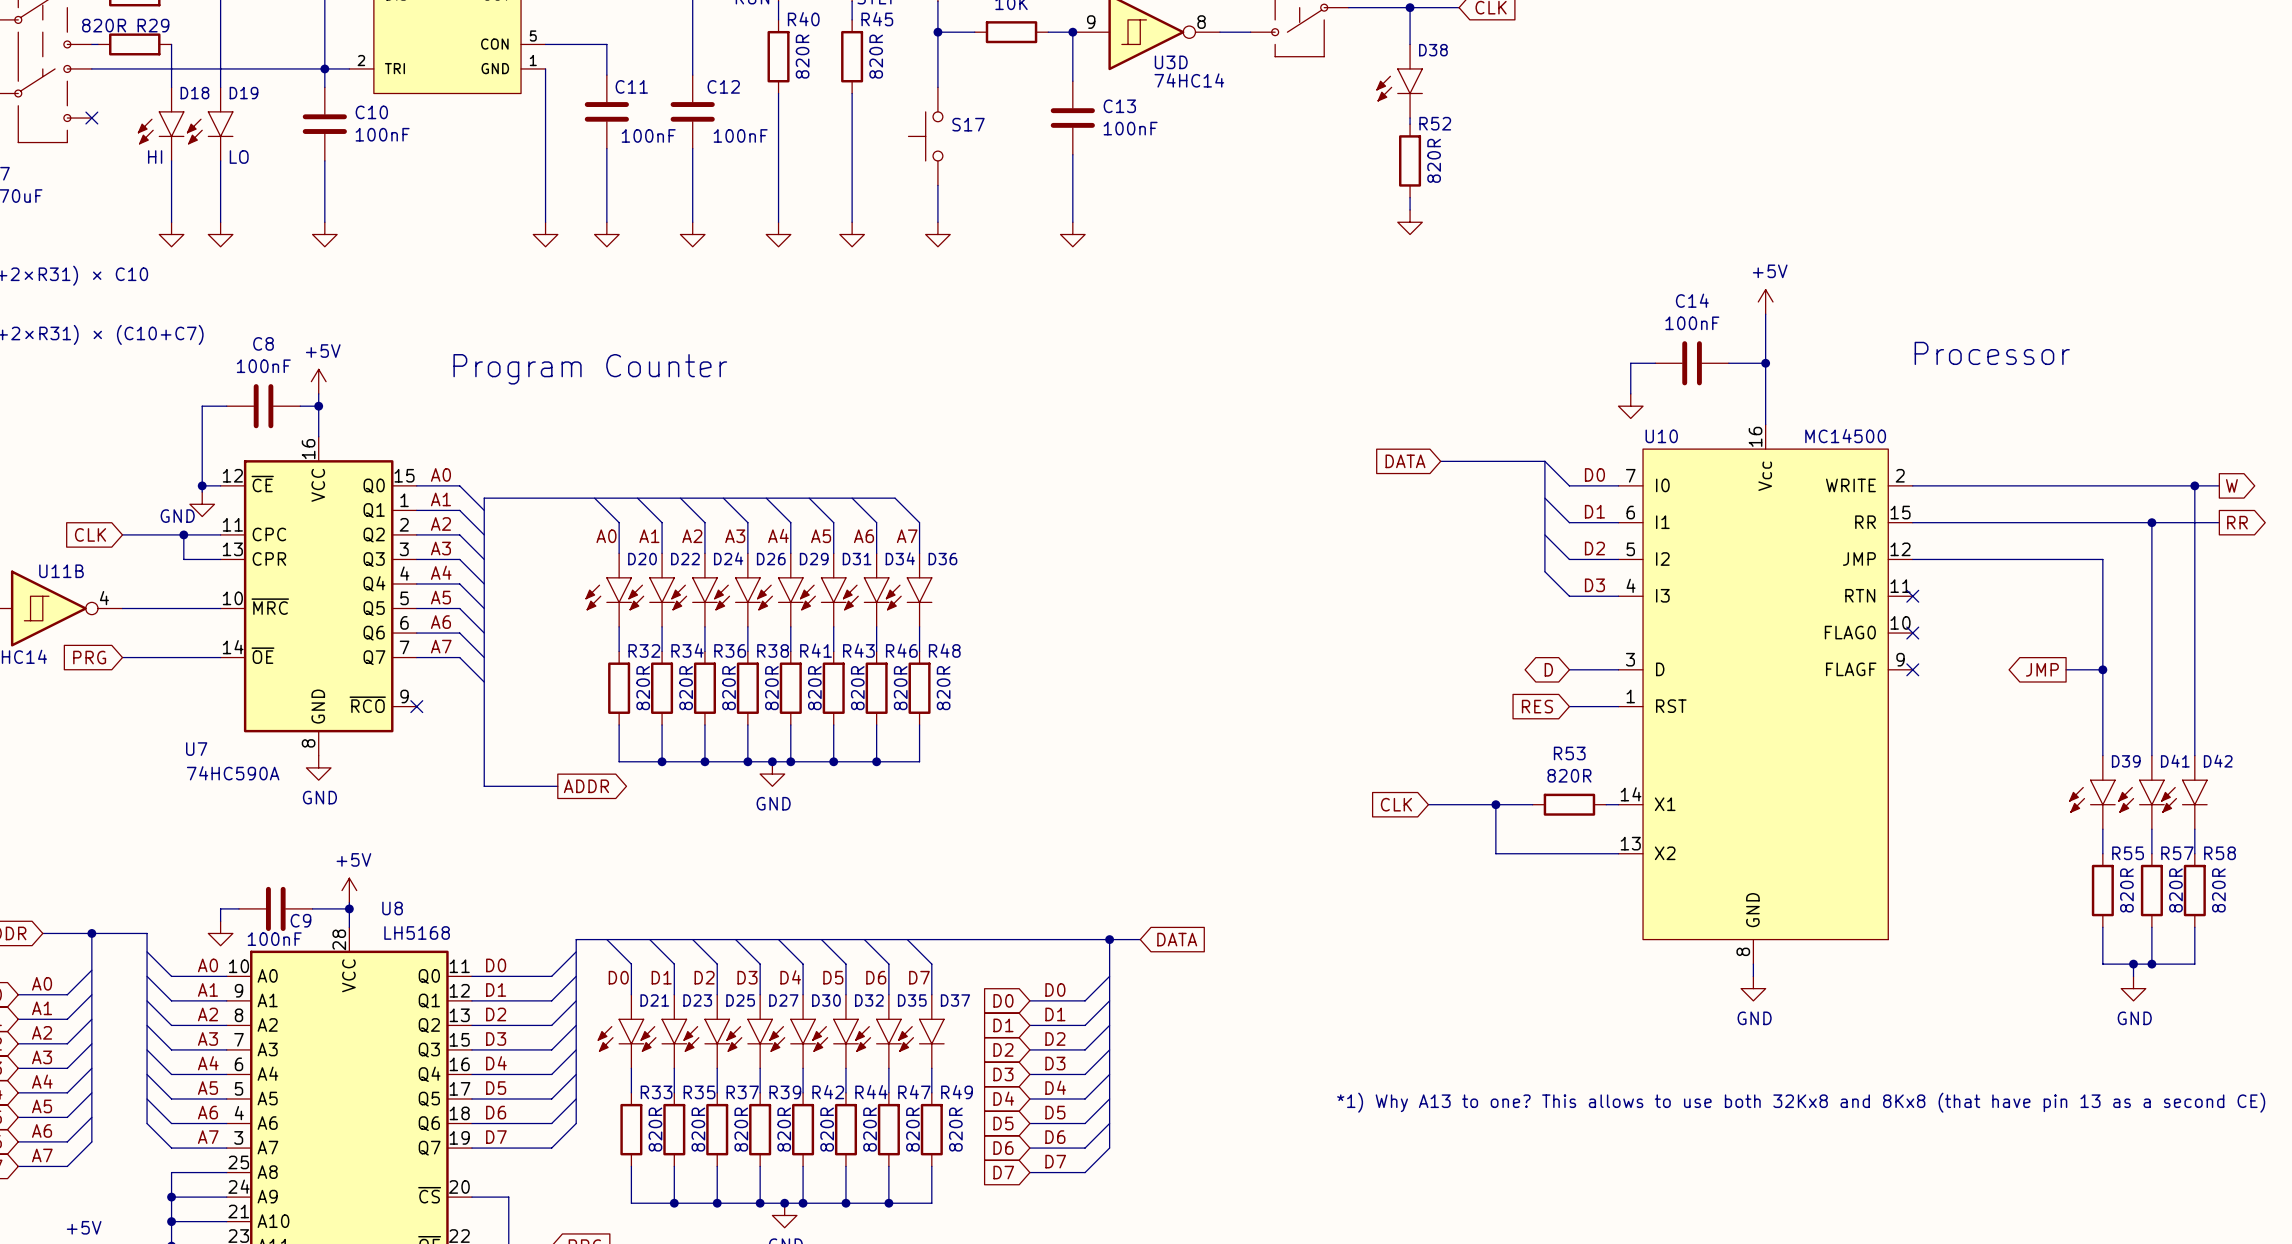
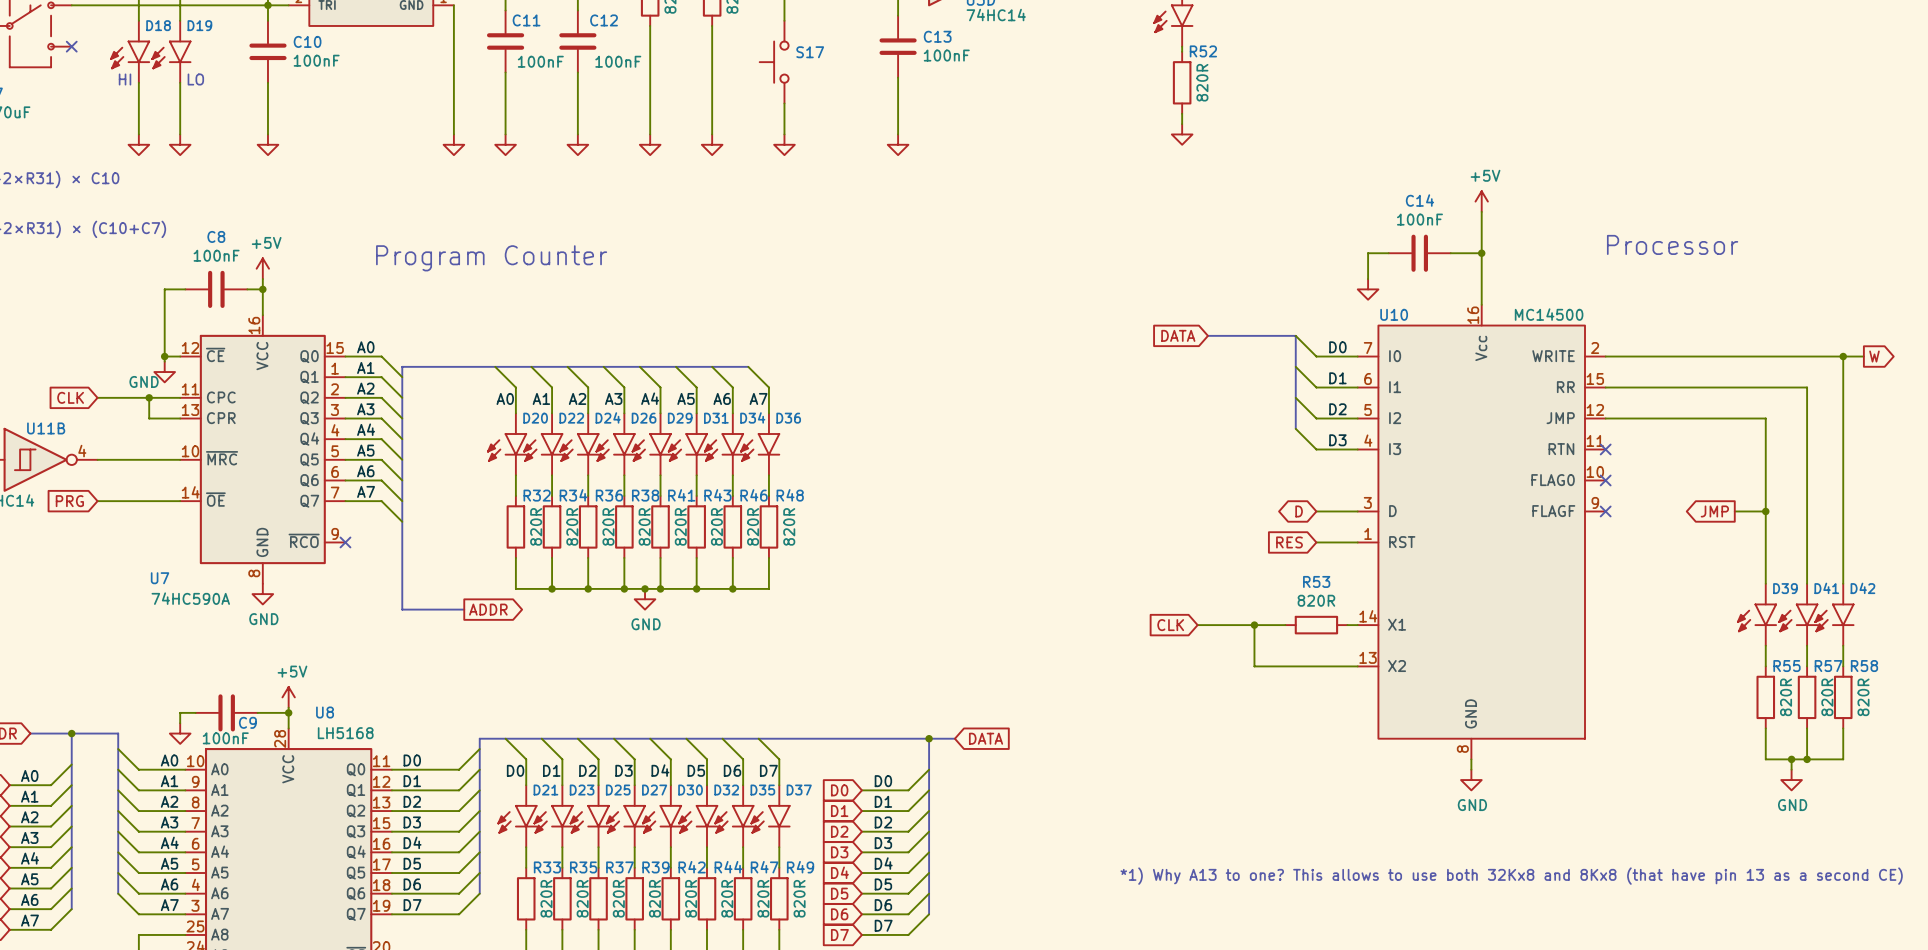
wire: (2151, 522) (2219, 522) -> none
junction: (2151, 522) -> none
global label: RR (2237, 522) -> none

